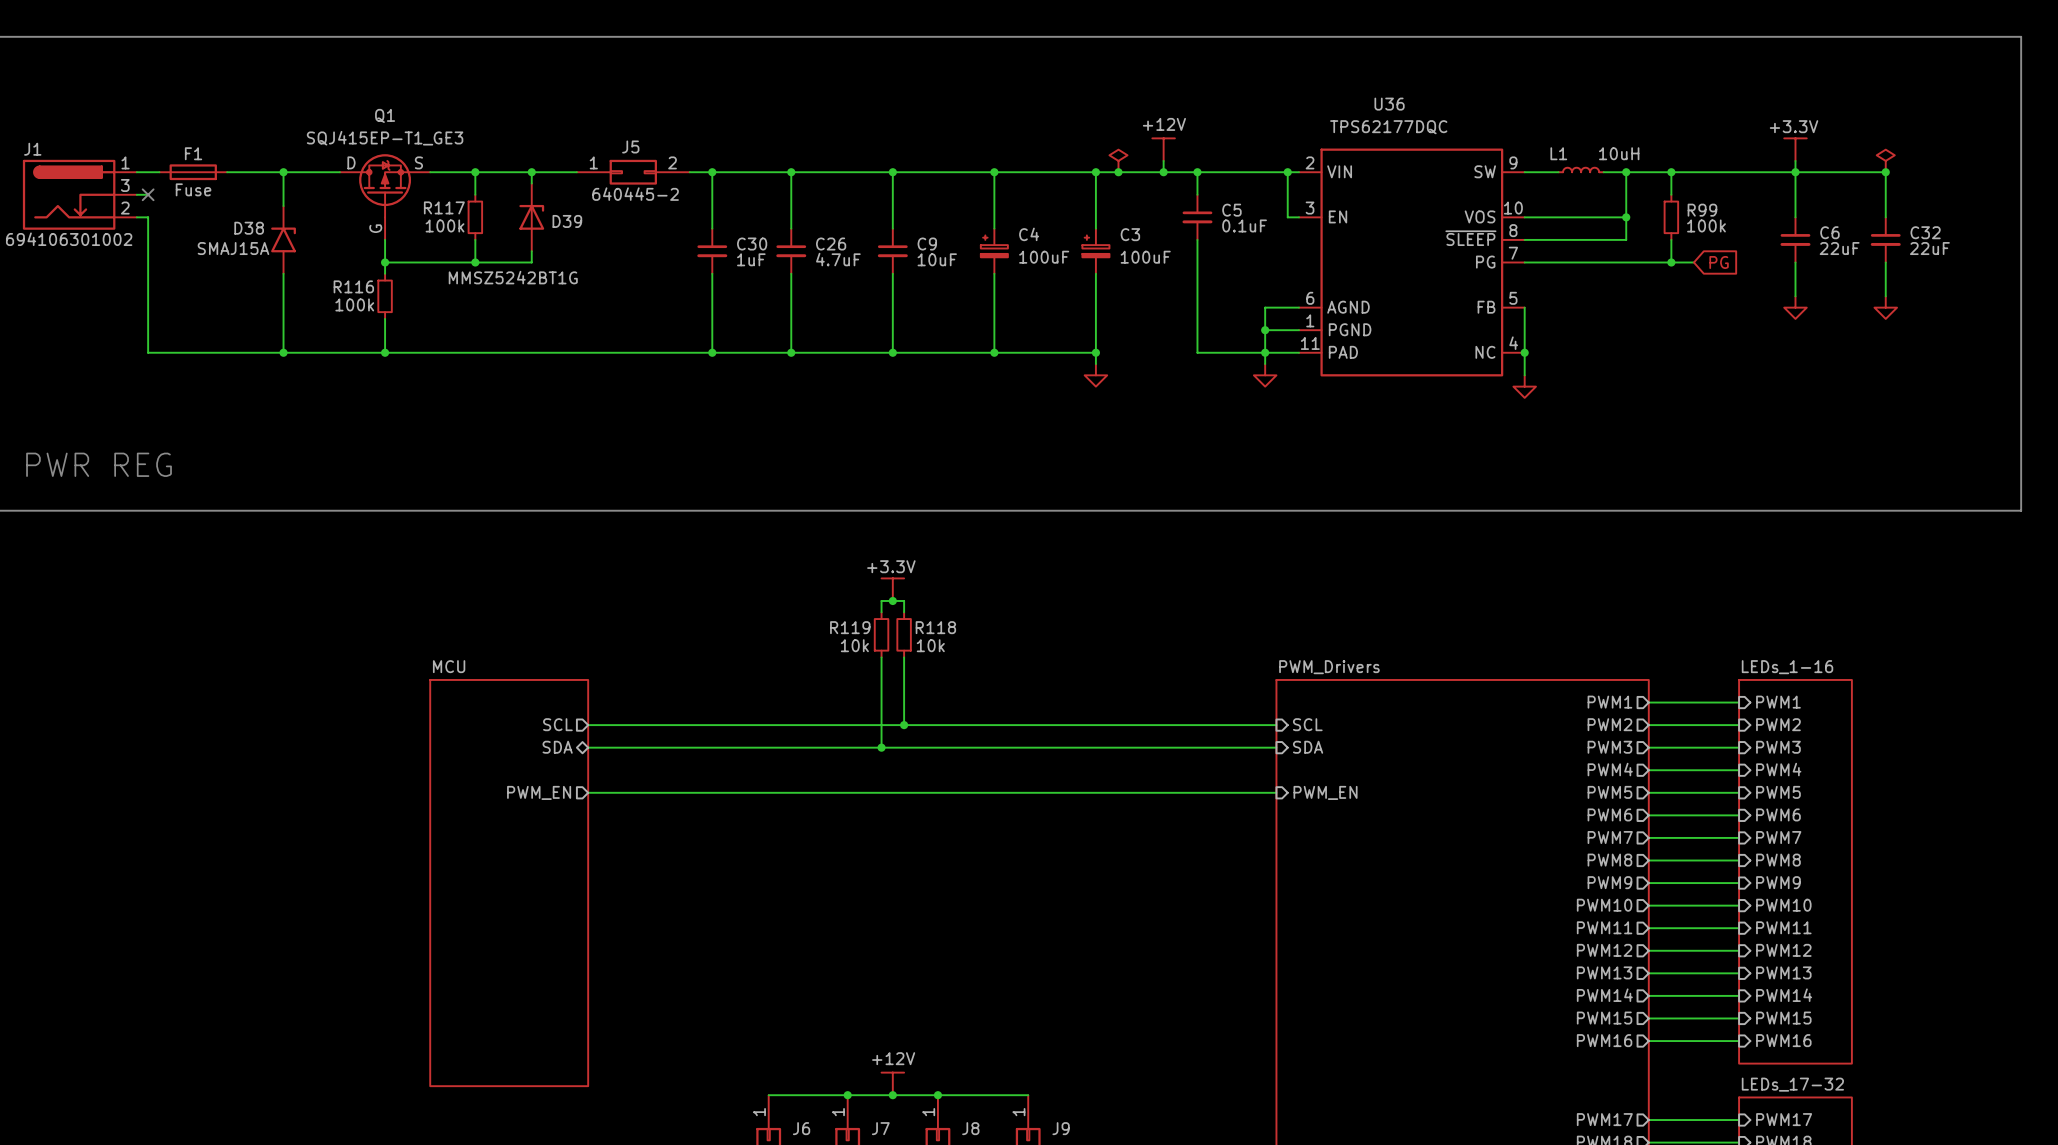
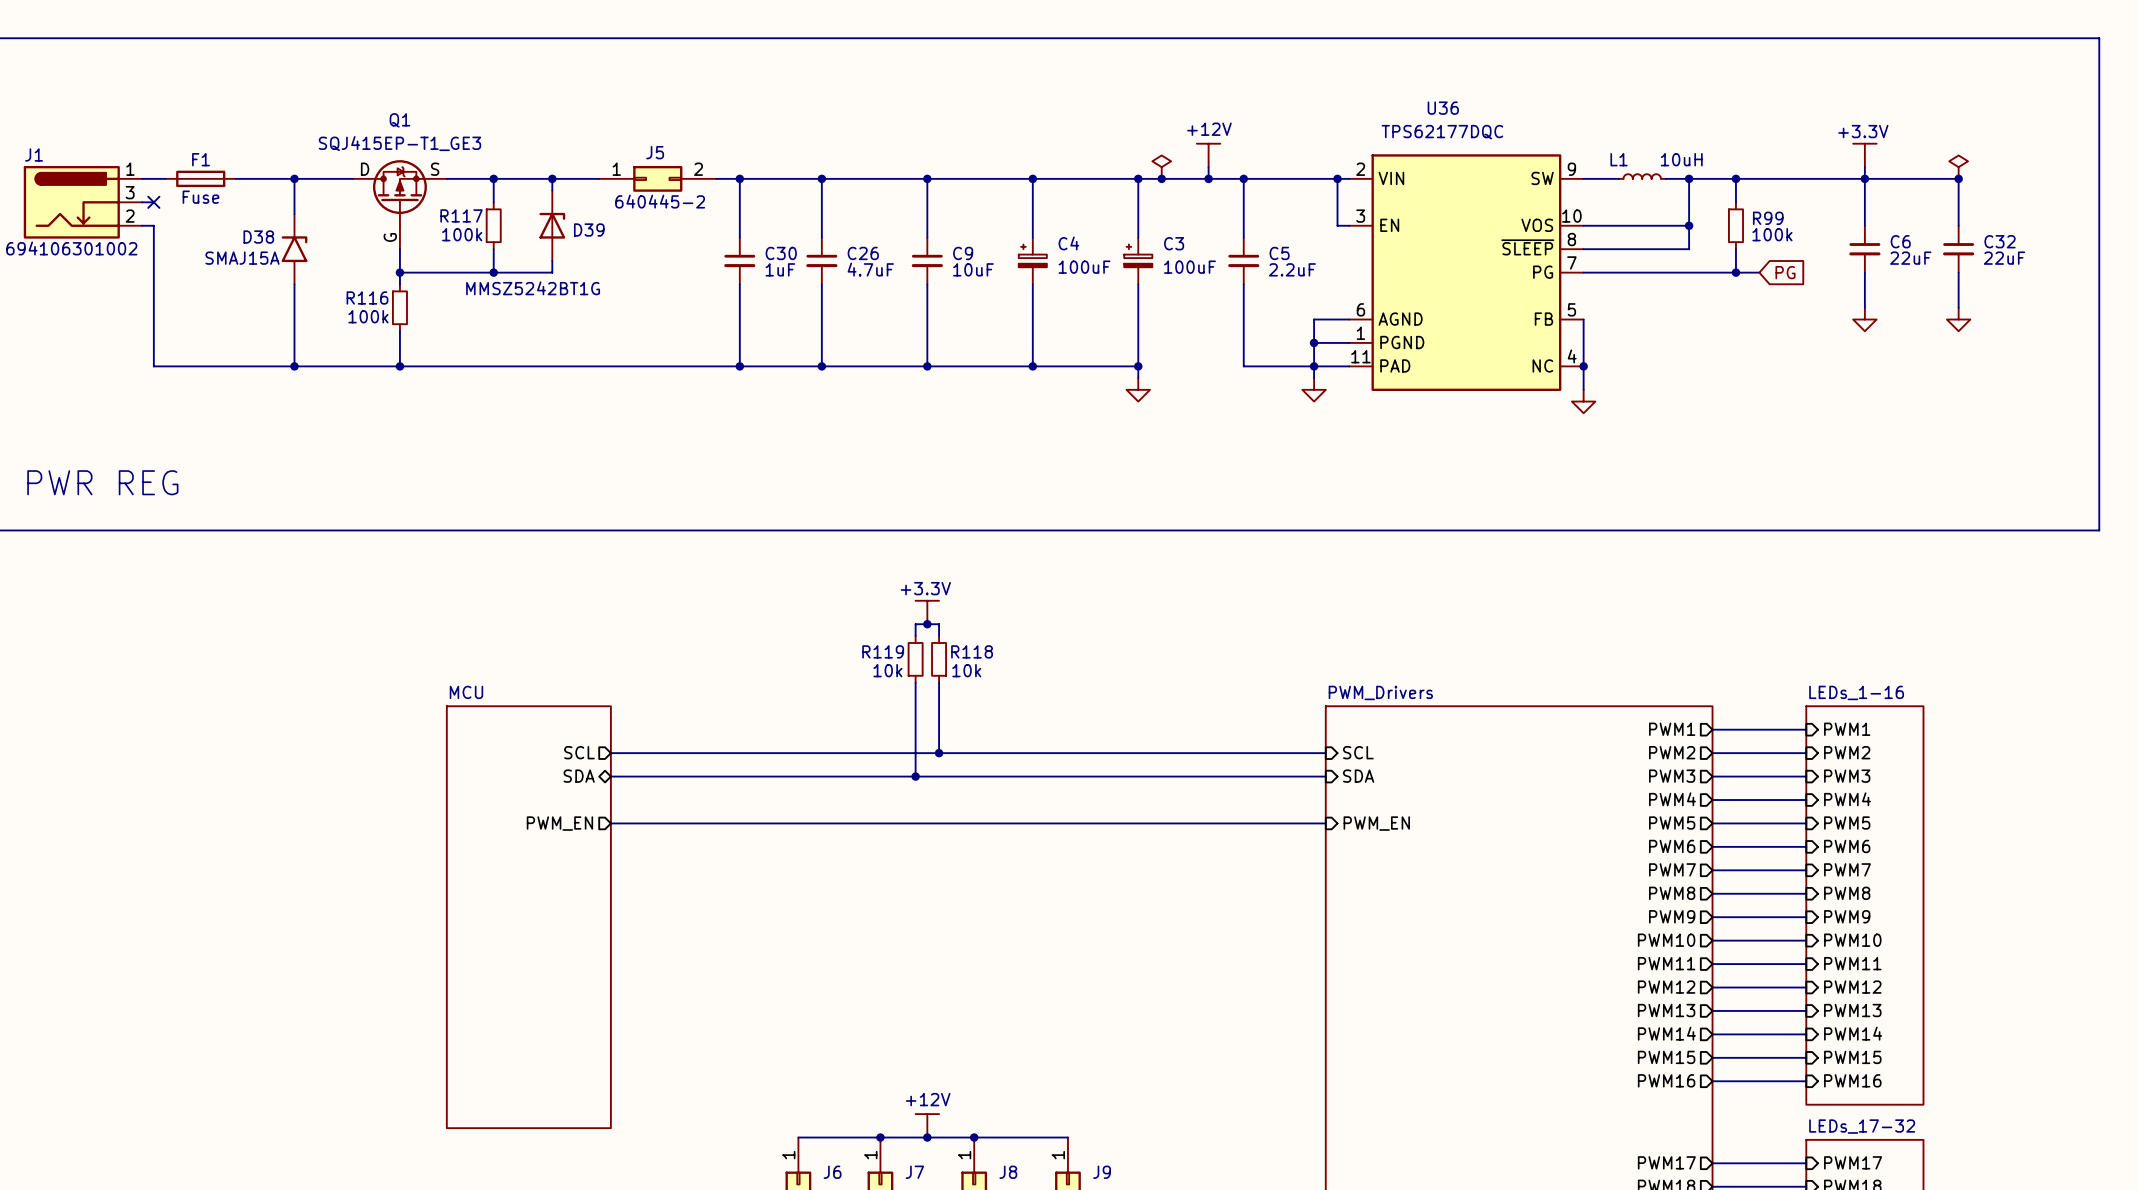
C5 position: (1197, 217) -> (1243, 260)
C5 value: 0.1uF (1244, 225) -> 2.2uF (1292, 269)

